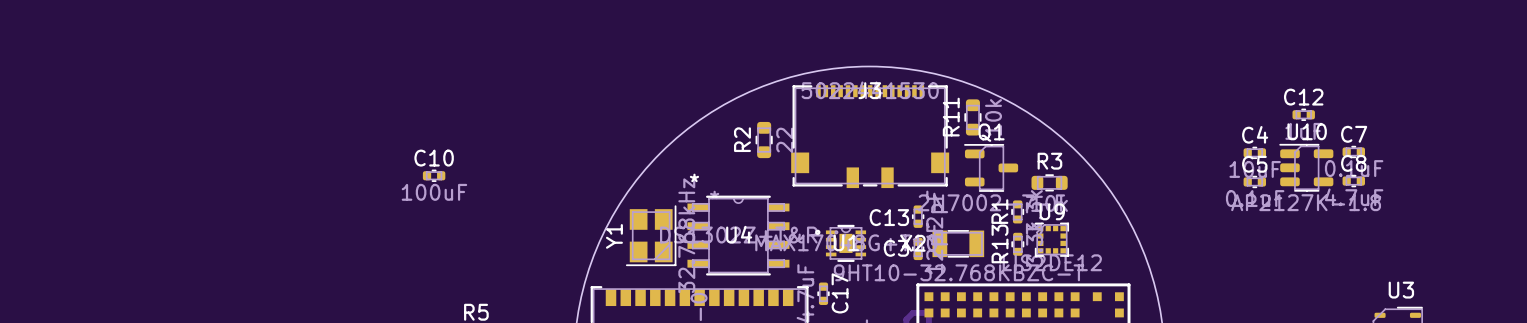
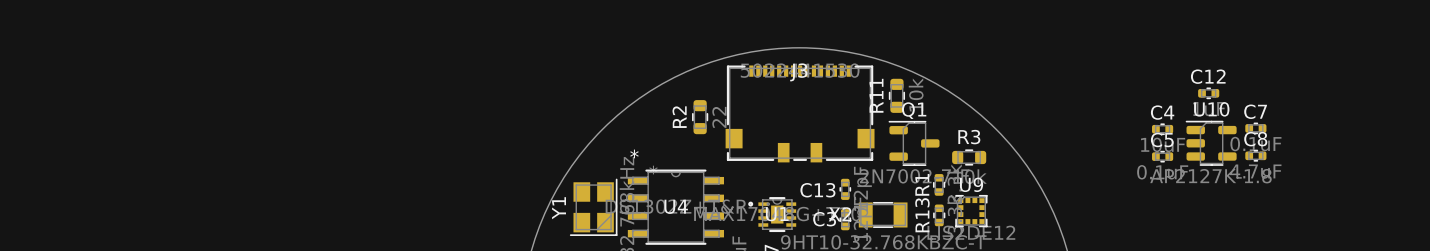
C10: 100uF (434, 175) -> none

